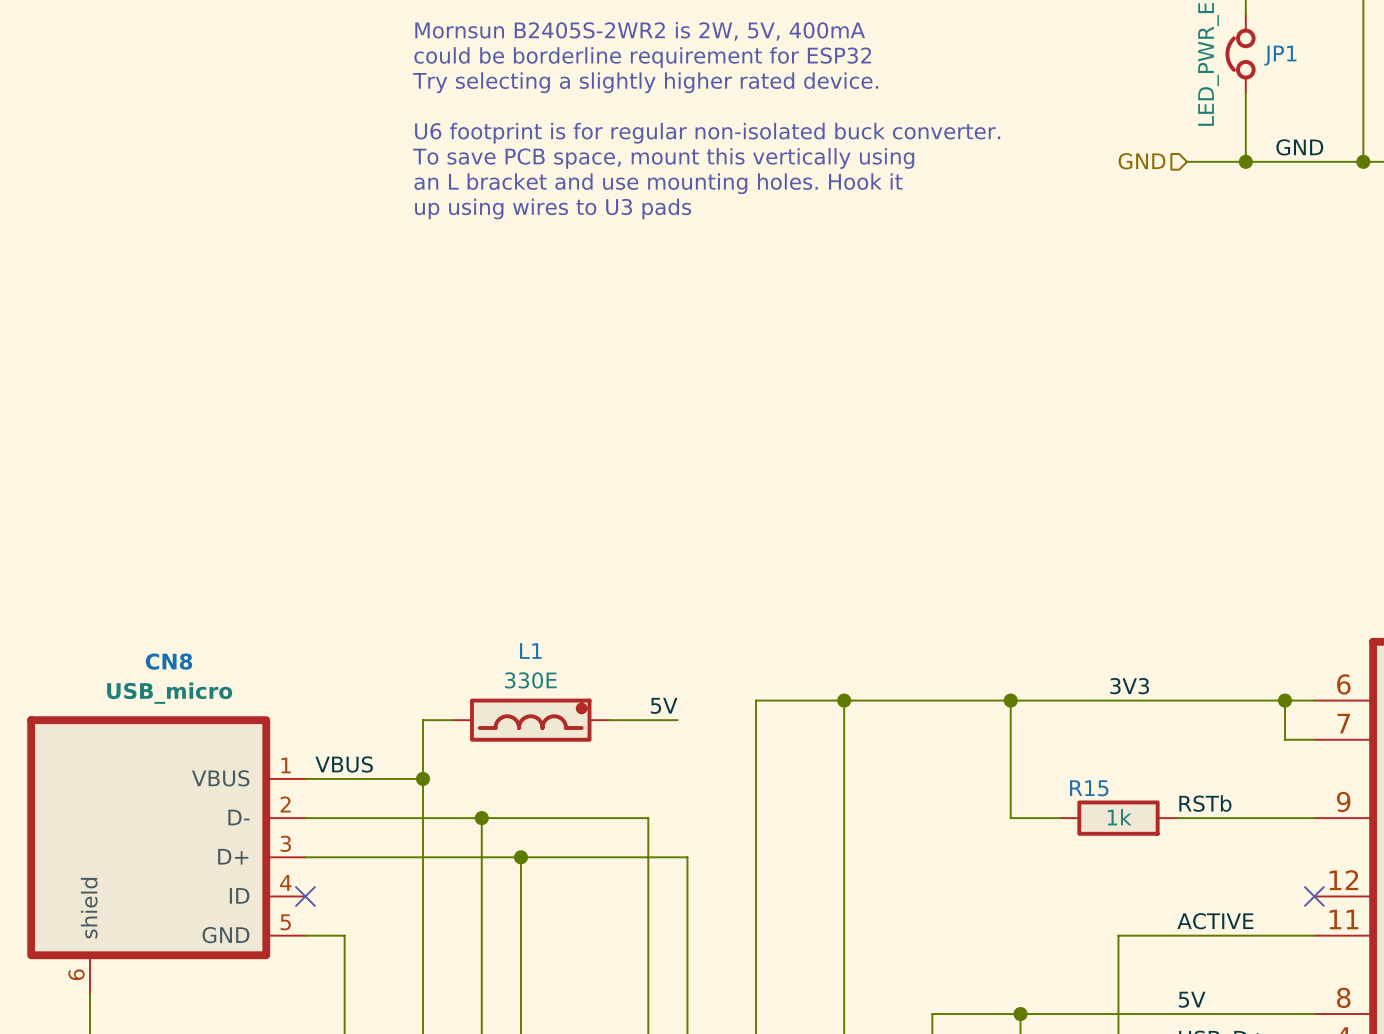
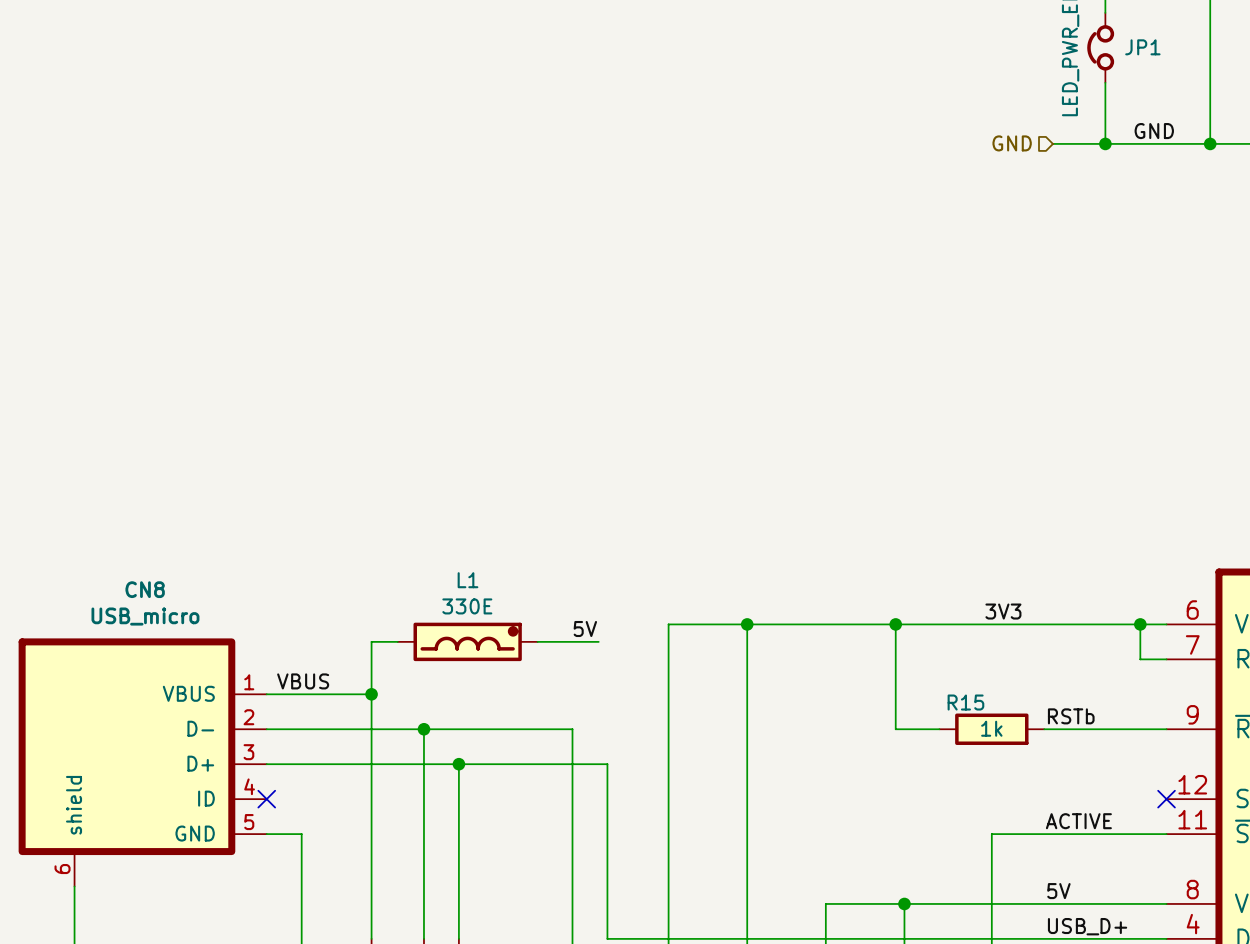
text: Mornsun B2405S-2WR2 is 2W, 5V, 400mA (640, 31) -> none
text: could be borderline requirement for ESP32 (642, 57) -> none
text: Try selecting a slightly higher rated device. (645, 82) -> none
text: U6 footprint is for regular non-isolated buck converter. (707, 133) -> none
text: To save PCB space, mount this vertically using (663, 158) -> none
text: an L bracket and use mounting holes. Hook it (658, 183) -> none
text: up using wires to U3 pads (553, 208) -> none

